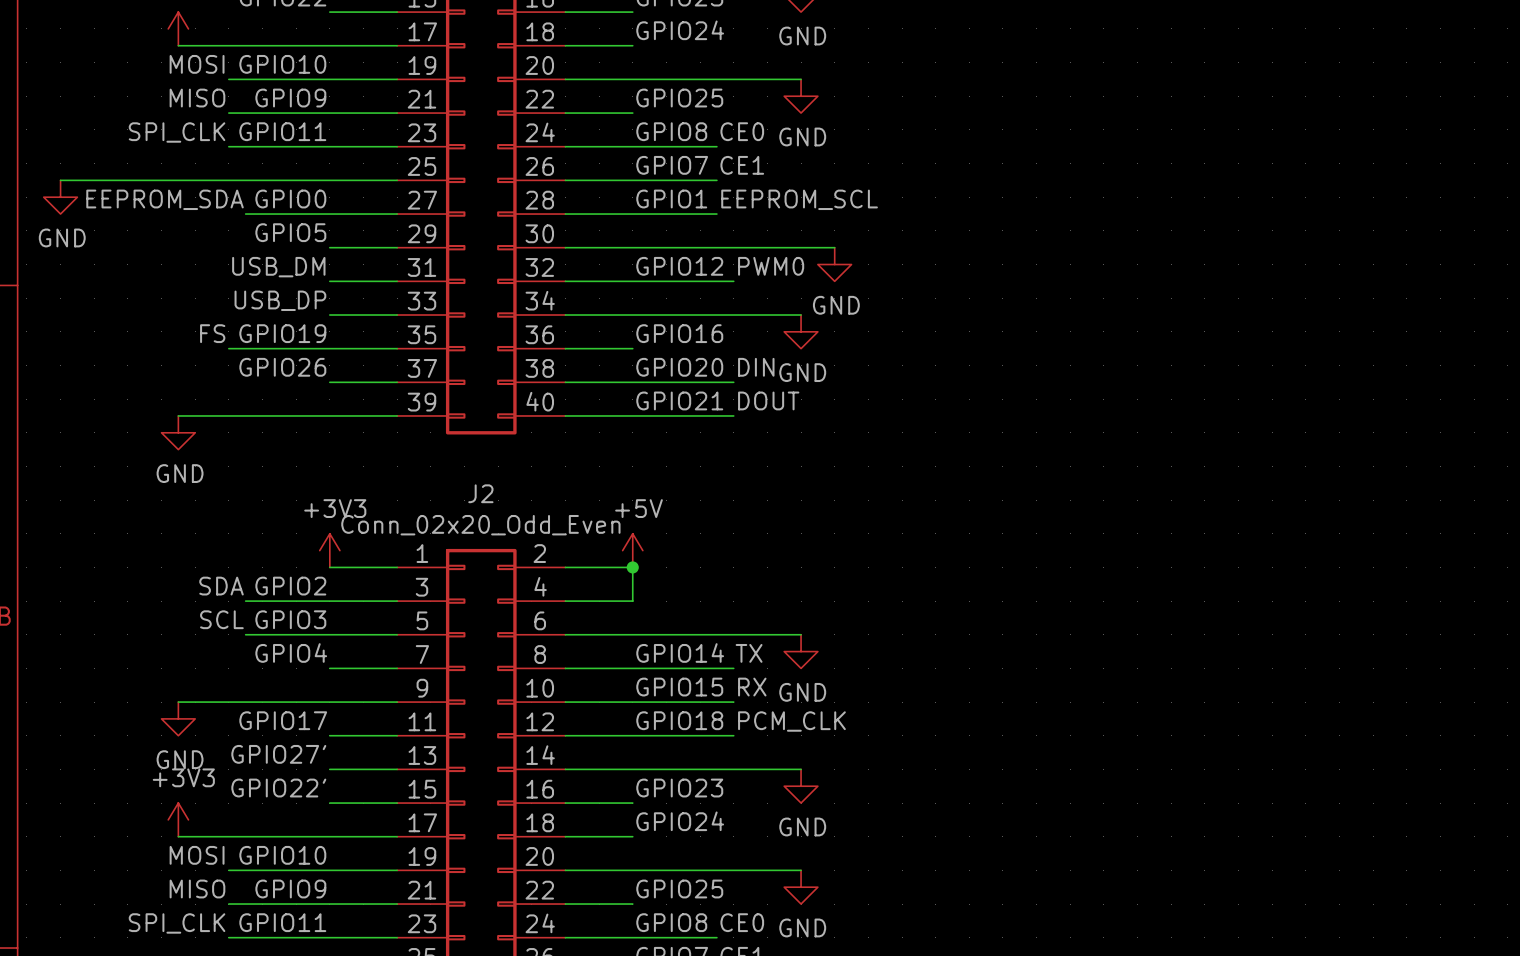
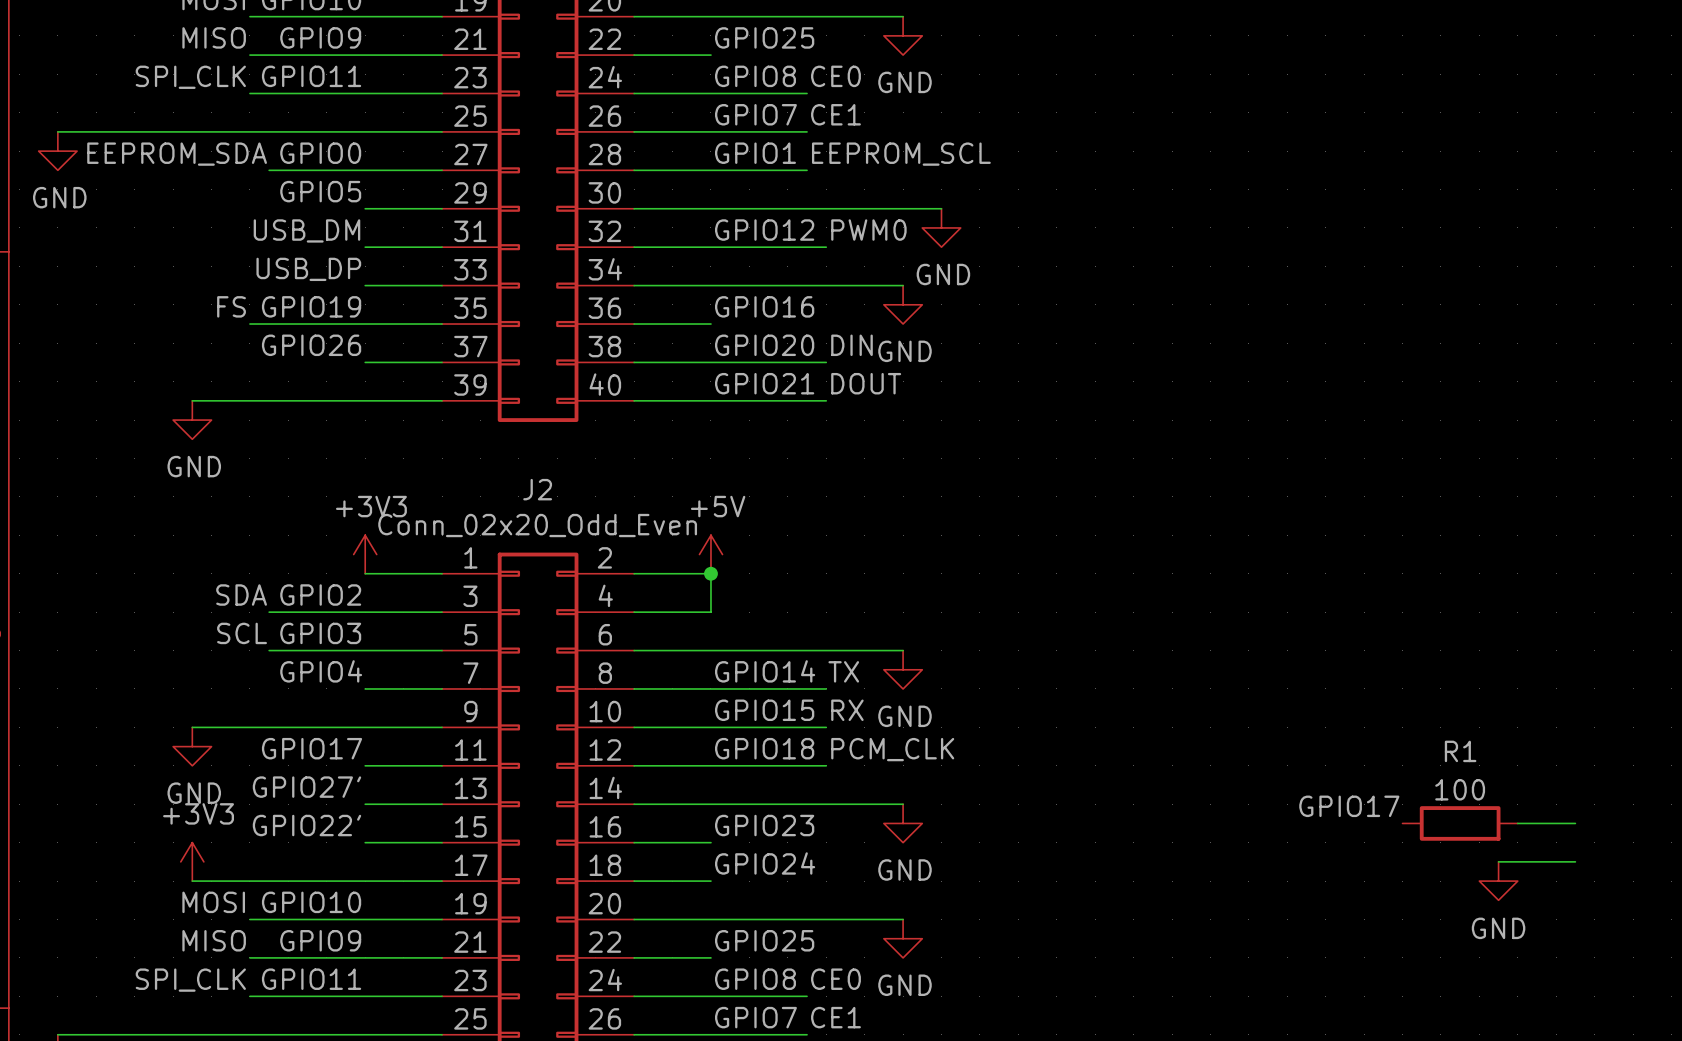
label: none -> GPIO17 (1349, 806)
R1: none -> 100 (1460, 823)
wire: none -> (1517, 823) (1575, 823)
wire: none -> (1498, 861) (1575, 861)
power symbol: none -> GND (1498, 881)

